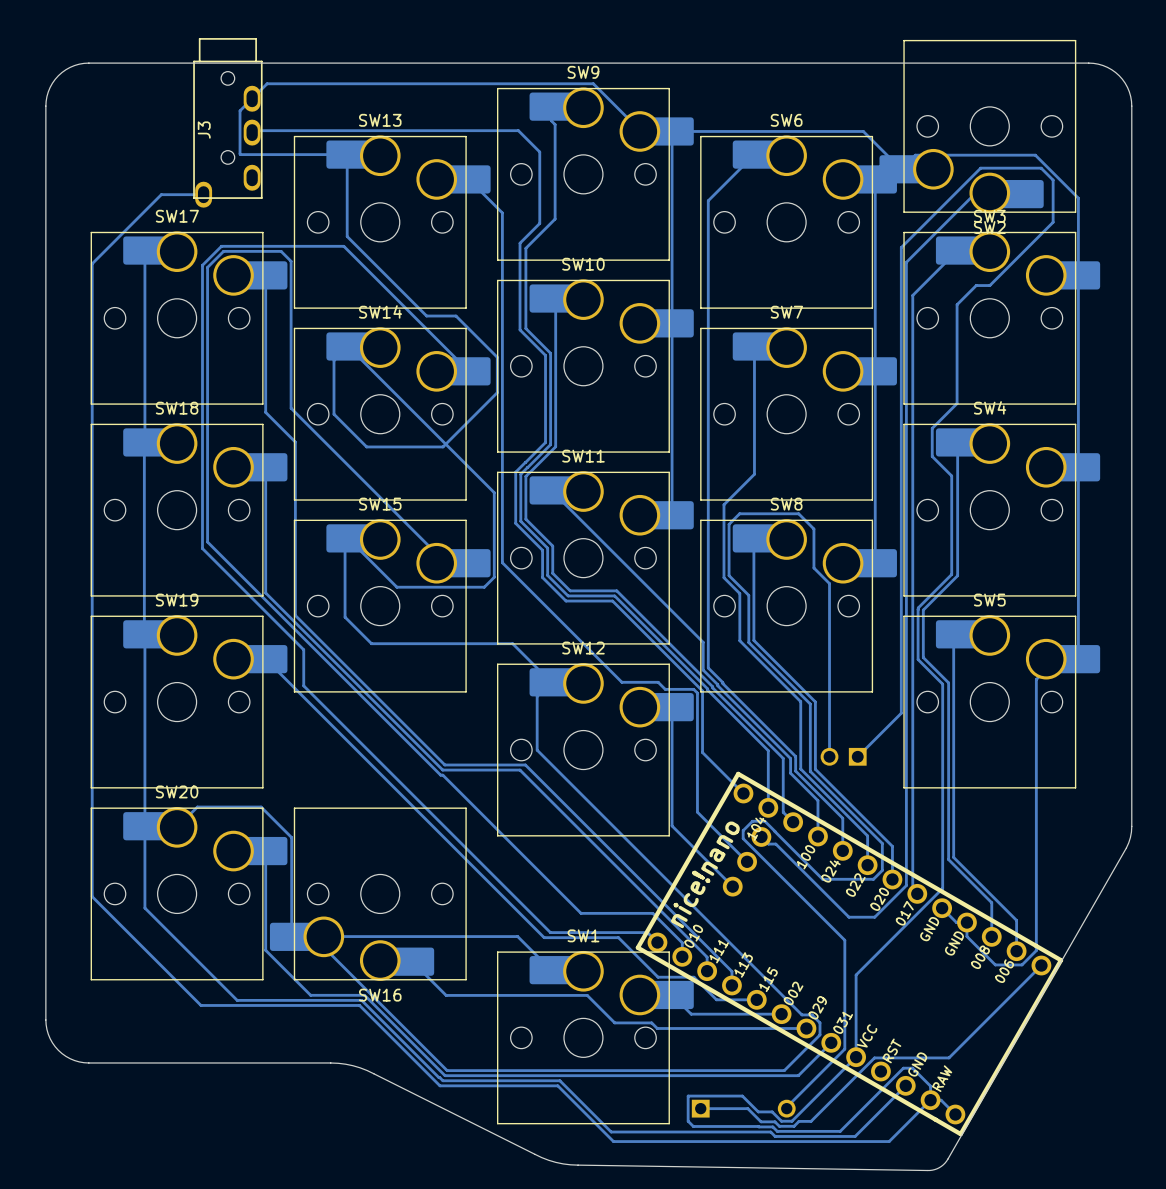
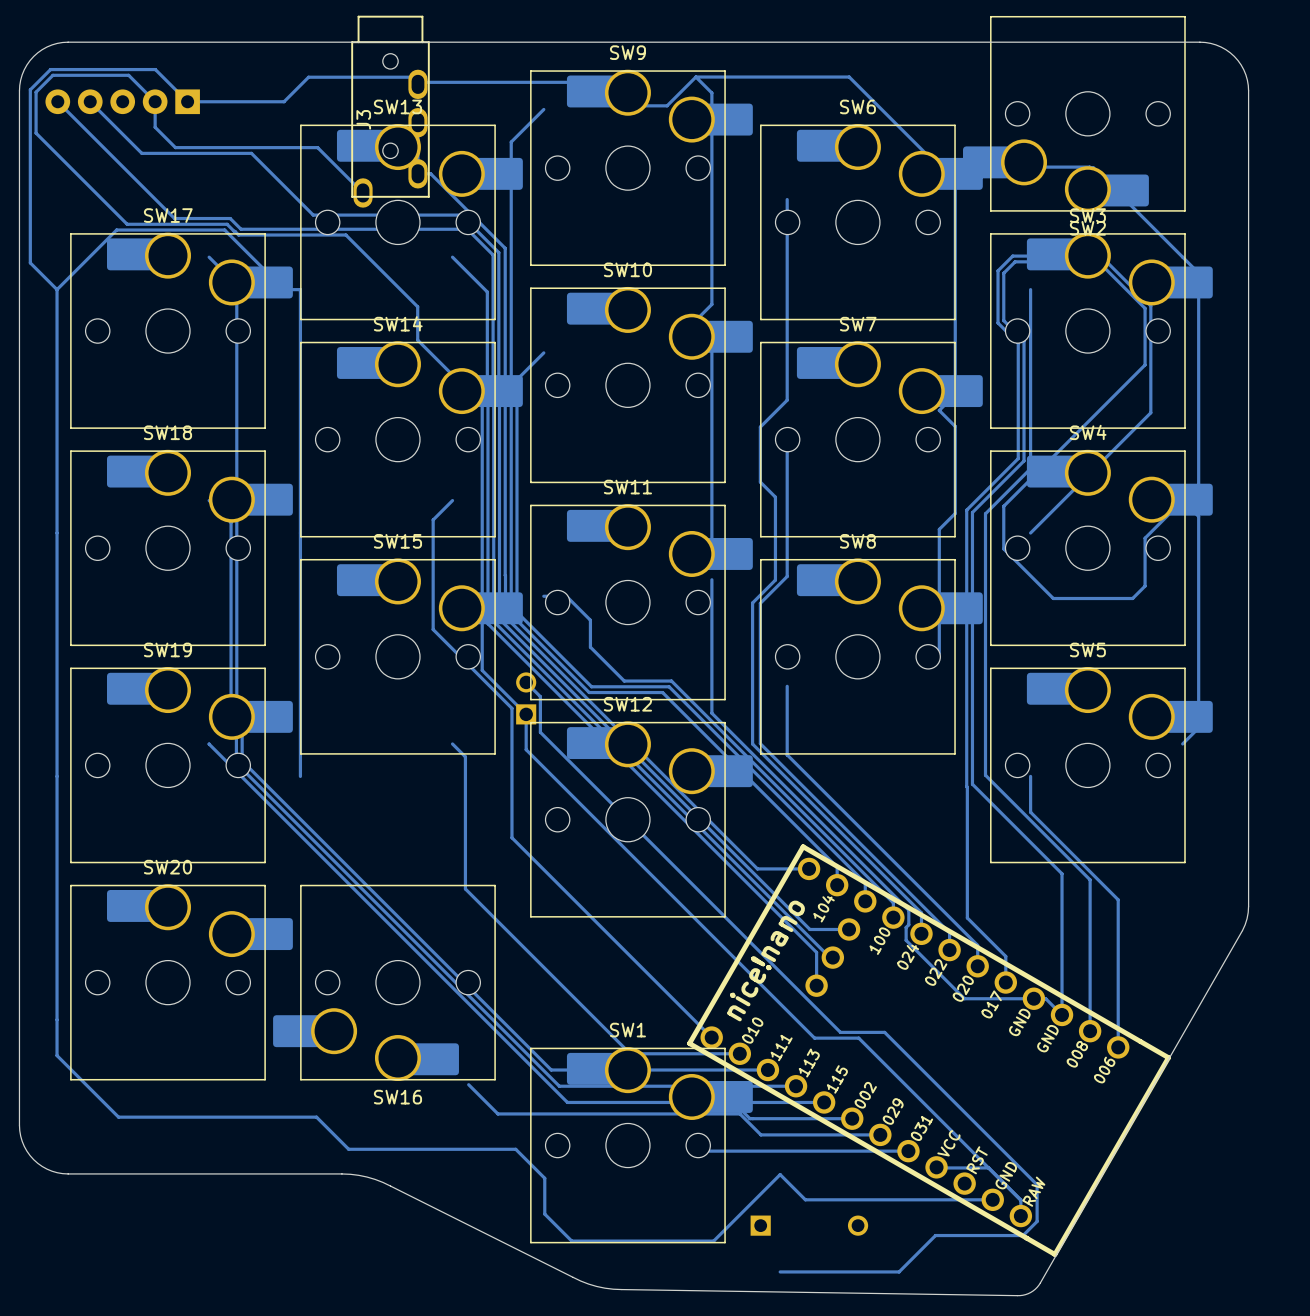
bottom track: none -> (695, 77) (667, 105) (639, 105) (615, 82) (420, 82) (417, 84) (410, 77) (308, 77) (284, 101) (187, 101) (155, 69) (50, 69) (30, 89) (30, 262) (57, 289)
bottom track: none -> (695, 77) (711, 93) (711, 304) (695, 320) (711, 336) (711, 547) (695, 563)
bottom track: none -> (695, 77) (849, 77) (955, 183) (955, 394) (939, 410) (955, 426) (955, 513) (939, 529) (939, 653)
bottom track: (551, 106) (551, 120) (555, 124) (555, 219) (525, 248) (525, 328) (550, 353) (550, 444) (527, 467) -> none
bottom track: none -> (57, 101) (174, 218) (230, 218) (241, 229) (467, 229) (493, 255) (493, 621) (829, 957) (832, 957)
bottom track: none -> (90, 101) (141, 153) (251, 153) (313, 215) (461, 215) (498, 252) (499, 619) (809, 929) (849, 929)
part: none -> (122, 101)
J3 position: (227, 122) -> (390, 111)
bottom track: (672, 131) (672, 515) -> none
bottom track: (252, 132) (254, 130) (518, 130) (539, 152) (539, 223) (520, 243) (520, 329) (545, 355) (545, 442) (525, 462) -> none
bottom track: (754, 154) (708, 200) (708, 668) (795, 756) (795, 771) (842, 818) (842, 832) -> (787, 199) (787, 400) (760, 427) (760, 482) (775, 497) (775, 580) (752, 602) (752, 744) (921, 912)
bottom track: (901, 169) (885, 169) (875, 179) (875, 563) -> none
bottom track: (901, 169) (863, 131) (641, 131) (593, 83) (267, 83) (240, 110) (240, 154) (348, 154) (347, 236) (426, 316) (456, 316) (497, 357) (497, 392) (443, 446) (366, 446) (333, 414) (333, 360) (348, 346) (494, 492) (494, 577) (484, 587) (396, 587) (348, 538) (345, 541) (345, 617) (371, 643) (512, 643) (551, 682) (537, 696) (537, 750) (801, 1014) (812, 1014) (820, 1022) (820, 1034) (784, 1070) (447, 1070) (313, 936) (291, 936) (291, 837) (261, 807) (197, 807) (177, 827) -> none
bottom track: (901, 169) (915, 155) (1035, 155) (1078, 198) (1078, 659) (1056, 659) (1036, 679) (1036, 950) (1022, 964) (995, 964) (966, 936) (966, 922) (956, 922) (942, 908) -> none
bottom track: none -> (939, 167) (1093, 167) (1198, 273) (1198, 484) (1145, 538) (1145, 586) (1132, 598) (1053, 598) (1003, 548) (1003, 506) (1145, 364) (1145, 308) (1098, 261) (1015, 261) (1003, 273) (1003, 320) (1024, 340) (1024, 460) (972, 512) (972, 784) (1062, 873) (1062, 1014) (1045, 998) (964, 998) (906, 940) (908, 910) (711, 713) (711, 579)
bottom track: (468, 179) (502, 212) (502, 562) (621, 682) (658, 682) (665, 689) (693, 689) (697, 693) (697, 812) (747, 861) -> none
bottom track: (203, 194) (161, 194) (92, 263) (92, 896) (201, 1005) (359, 1005) (439, 1085) (557, 1085) (613, 1141) (889, 1141) (930, 1100) (941, 1100) (955, 1114) -> none
bottom track: (1021, 194) (974, 194) (906, 262) (906, 885) (874, 917) (849, 917) (775, 844) (768, 844) (761, 836) -> none
bottom track: none -> (363, 192) (317, 147) (175, 147) (155, 127) (155, 101) (128, 75) (52, 75) (36, 92) (36, 133) (127, 224) (227, 224) (238, 235) (345, 235) (417, 306) (417, 340) (482, 404) (482, 670) (526, 714) (526, 749) (814, 1038) (858, 1038) (1000, 1179)
bottom track: (144, 250) (144, 908) (237, 1000) (361, 1000) (442, 1080) (559, 1080) (611, 1132) (770, 1132) (775, 1136) (855, 1136) (905, 1085) -> (57, 289) (57, 1055) (118, 1117) (316, 1117) (348, 1149) (515, 1149) (544, 1178) (544, 1214) (571, 1241) (713, 1241) (780, 1174) (805, 1199) (992, 1199)
bottom track: (957, 250) (912, 295) (912, 889) (917, 893) -> (1030, 533) (1150, 412) (1150, 305) (1100, 256) (1012, 256) (998, 270) (998, 323) (1018, 343) (1018, 458) (966, 510) (967, 917) (1005, 956) (1005, 982)
bottom track: none -> (452, 257) (487, 291) (487, 623) (816, 952) (816, 985)
bottom track: (265, 275) (265, 412) (295, 442) (295, 615) (444, 764) (525, 764) (731, 971) (731, 985) -> (209, 500) (231, 522) (231, 699) (236, 704) (236, 763) (559, 1086) (796, 1086)
bottom track: none -> (57, 289) (116, 230) (224, 230) (284, 289) (300, 289) (300, 776)
bottom track: (551, 298) (555, 302) (555, 446) (529, 472) -> none
bottom track: (754, 346) (754, 474) (723, 504) (723, 577) (739, 593) (739, 640) (800, 701) (800, 769) (867, 835) (867, 850) -> (787, 442) (787, 576) (760, 603) (760, 743) (949, 932)
bottom track: (468, 371) (343, 246) (221, 246) (202, 265) (202, 548) (303, 649) (303, 685) (550, 932) (647, 932) -> (452, 500) (433, 519) (433, 629) (511, 708) (511, 837) (700, 1026)
bottom track: (957, 442) (957, 575) (923, 610) (923, 657) (948, 682) (948, 859) (991, 902) -> (1030, 289) (1030, 468) (985, 513) (985, 775) (1090, 879) (1090, 992)
bottom track: (525, 462) (515, 472) (515, 523) (542, 550) (542, 577) (566, 601) (612, 601) (702, 690) (702, 752) (743, 793) -> (417, 122) (417, 173) (430, 173) (505, 248) (505, 616) (757, 868) (809, 868)
bottom track: (265, 467) (265, 592) (442, 770) (520, 770) (707, 957) (707, 971) -> (209, 257) (236, 284) (236, 696) (242, 702) (242, 760) (551, 1070) (767, 1070)
bottom track: (527, 467) (520, 474) (520, 521) (547, 548) (547, 575) (568, 595) (614, 595) (768, 750) (768, 791) -> (543, 109) (511, 142) (511, 614) (589, 692) (662, 692) (837, 867)
bottom track: none -> (1182, 500) (1198, 516) (1198, 727) (1182, 743)
bottom track: (529, 472) (525, 476) (525, 519) (552, 546) (552, 573) (570, 590) (616, 590) (783, 758) (783, 812) (793, 822) -> (543, 352) (516, 379) (516, 612) (591, 686) (669, 686) (865, 882) (865, 901)
bottom track: (551, 490) (703, 642) (703, 670) (790, 758) (790, 773) (817, 800) (817, 823) -> (543, 596) (566, 596) (590, 620) (590, 647) (624, 681) (671, 681) (893, 902)
bottom track: (754, 538) (753, 640) (815, 701) (815, 769) (892, 846) (892, 861) -> (787, 755) (977, 945)
bottom track: (468, 563) (446, 563) (291, 408) (291, 261) (281, 251) (223, 251) (207, 267) (207, 542) (581, 913) (652, 913) (682, 942) (682, 956) -> (452, 743) (465, 756) (465, 888) (630, 1053) (739, 1053)
bottom track: (918, 609) (951, 574) (951, 475) (932, 456) (932, 428) (957, 403) (957, 304) (976, 285) (989, 285) (1053, 222) (1053, 180) (1041, 168) (980, 168) (901, 247) (901, 713) (857, 756) -> none
bottom track: (918, 609) (918, 659) (942, 684) (942, 888) (856, 975) (856, 1057) -> none
bottom track: none -> (526, 682) (540, 696) (540, 732) (840, 1032) (884, 1032) (1037, 1184) (1037, 1221) (1023, 1235) (935, 1235) (899, 1271) (780, 1271)
bottom track: none -> (787, 686) (787, 755)
bottom track: (957, 634) (953, 638) (953, 857) (1016, 920) -> (1030, 776) (1030, 812) (1118, 899) (1118, 1012)
part: none -> (526, 698)
bottom track: (265, 659) (544, 937) (618, 937) (658, 977) (693, 977) (716, 999) -> (209, 744) (567, 1102) (778, 1102)
bottom track: (672, 707) (672, 825) (732, 886) -> none
bottom track: (829, 756) (829, 583) (813, 568) (813, 529) (798, 513) (739, 513) (729, 524) (729, 575) (748, 595) (748, 642) (810, 704) (810, 771) (882, 843) (882, 870) (873, 879) (822, 879) (764, 821) (752, 821) (743, 830) (743, 838) (844, 940) (844, 1049) (786, 1108) -> none
part: (843, 756) -> none
part footprint: [635, 771, 1064, 1137] -> [687, 844, 1171, 1257]
bottom track: (265, 851) (265, 950) (310, 995) (364, 995) (445, 1075) (798, 1075) (831, 1042) -> (696, 1145) (702, 1151) (908, 1151)
bottom track: (323, 936) (517, 936) (551, 970) -> none
bottom track: (412, 961) (446, 995) (587, 995) (614, 1022) (651, 1022) (657, 1028) (700, 1028) -> (468, 1084) (497, 1113) (739, 1113) (760, 1134)
bottom track: (1041, 965) (949, 1057) (874, 1057) (811, 1121) (798, 1121) (794, 1126) (779, 1126) (774, 1121) (761, 1121) (747, 1108) (700, 1108) -> none
bottom track: (856, 1057) (791, 1121) (781, 1121) (772, 1111) (758, 1111) (742, 1096) (688, 1096) (688, 1121) (693, 1126) (772, 1126) (777, 1131) (840, 1131) (903, 1068) (912, 1068) -> (936, 1167) (988, 1167)

